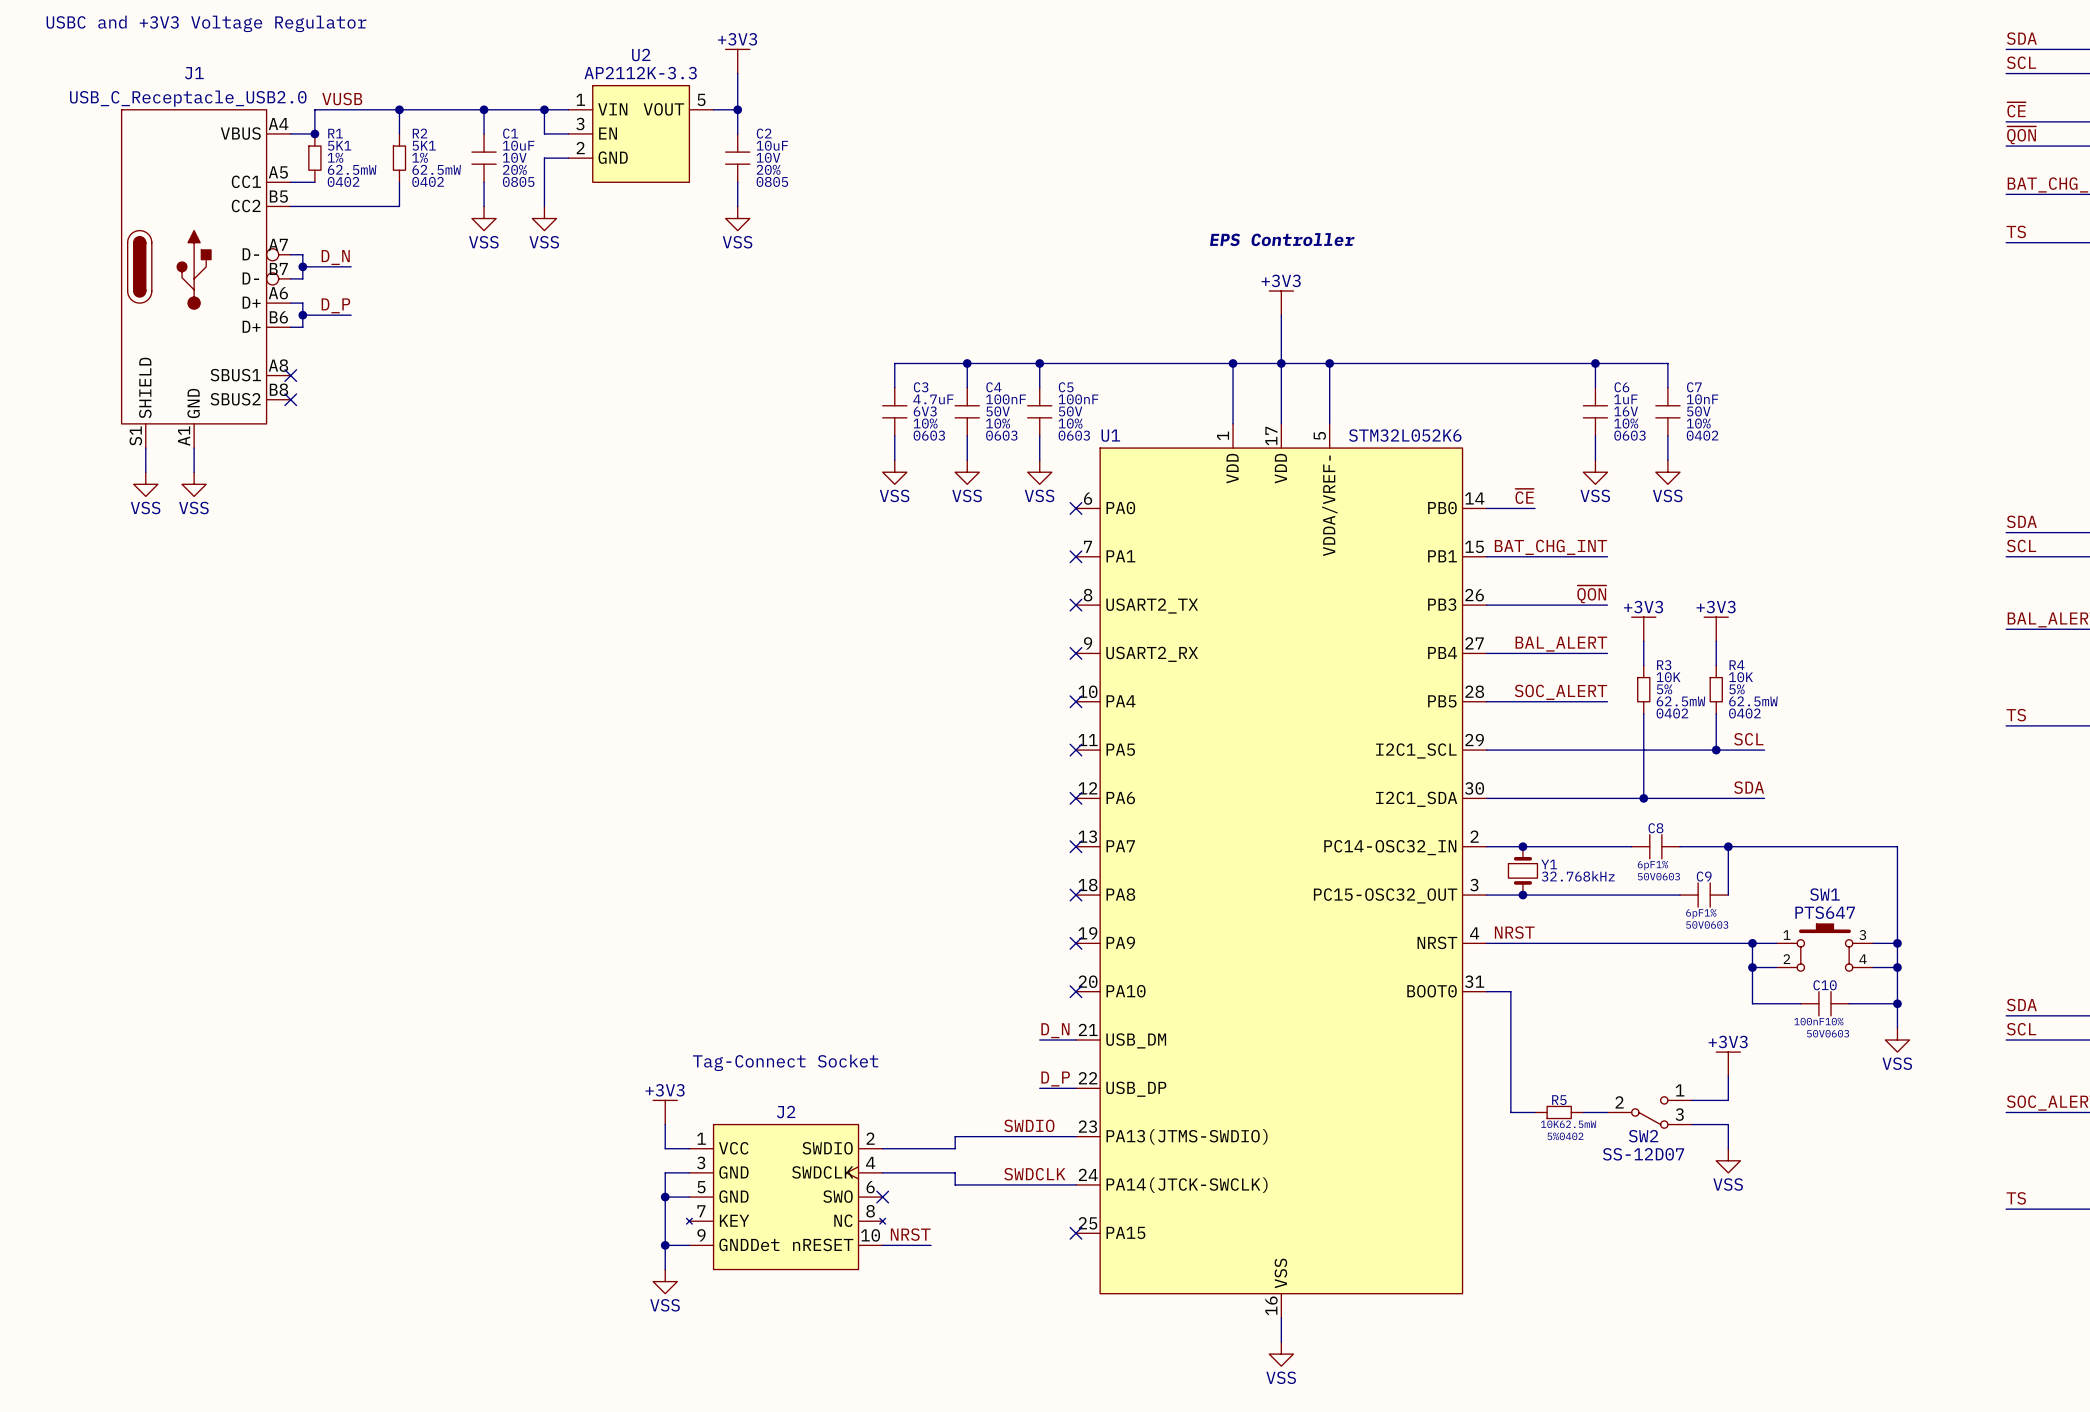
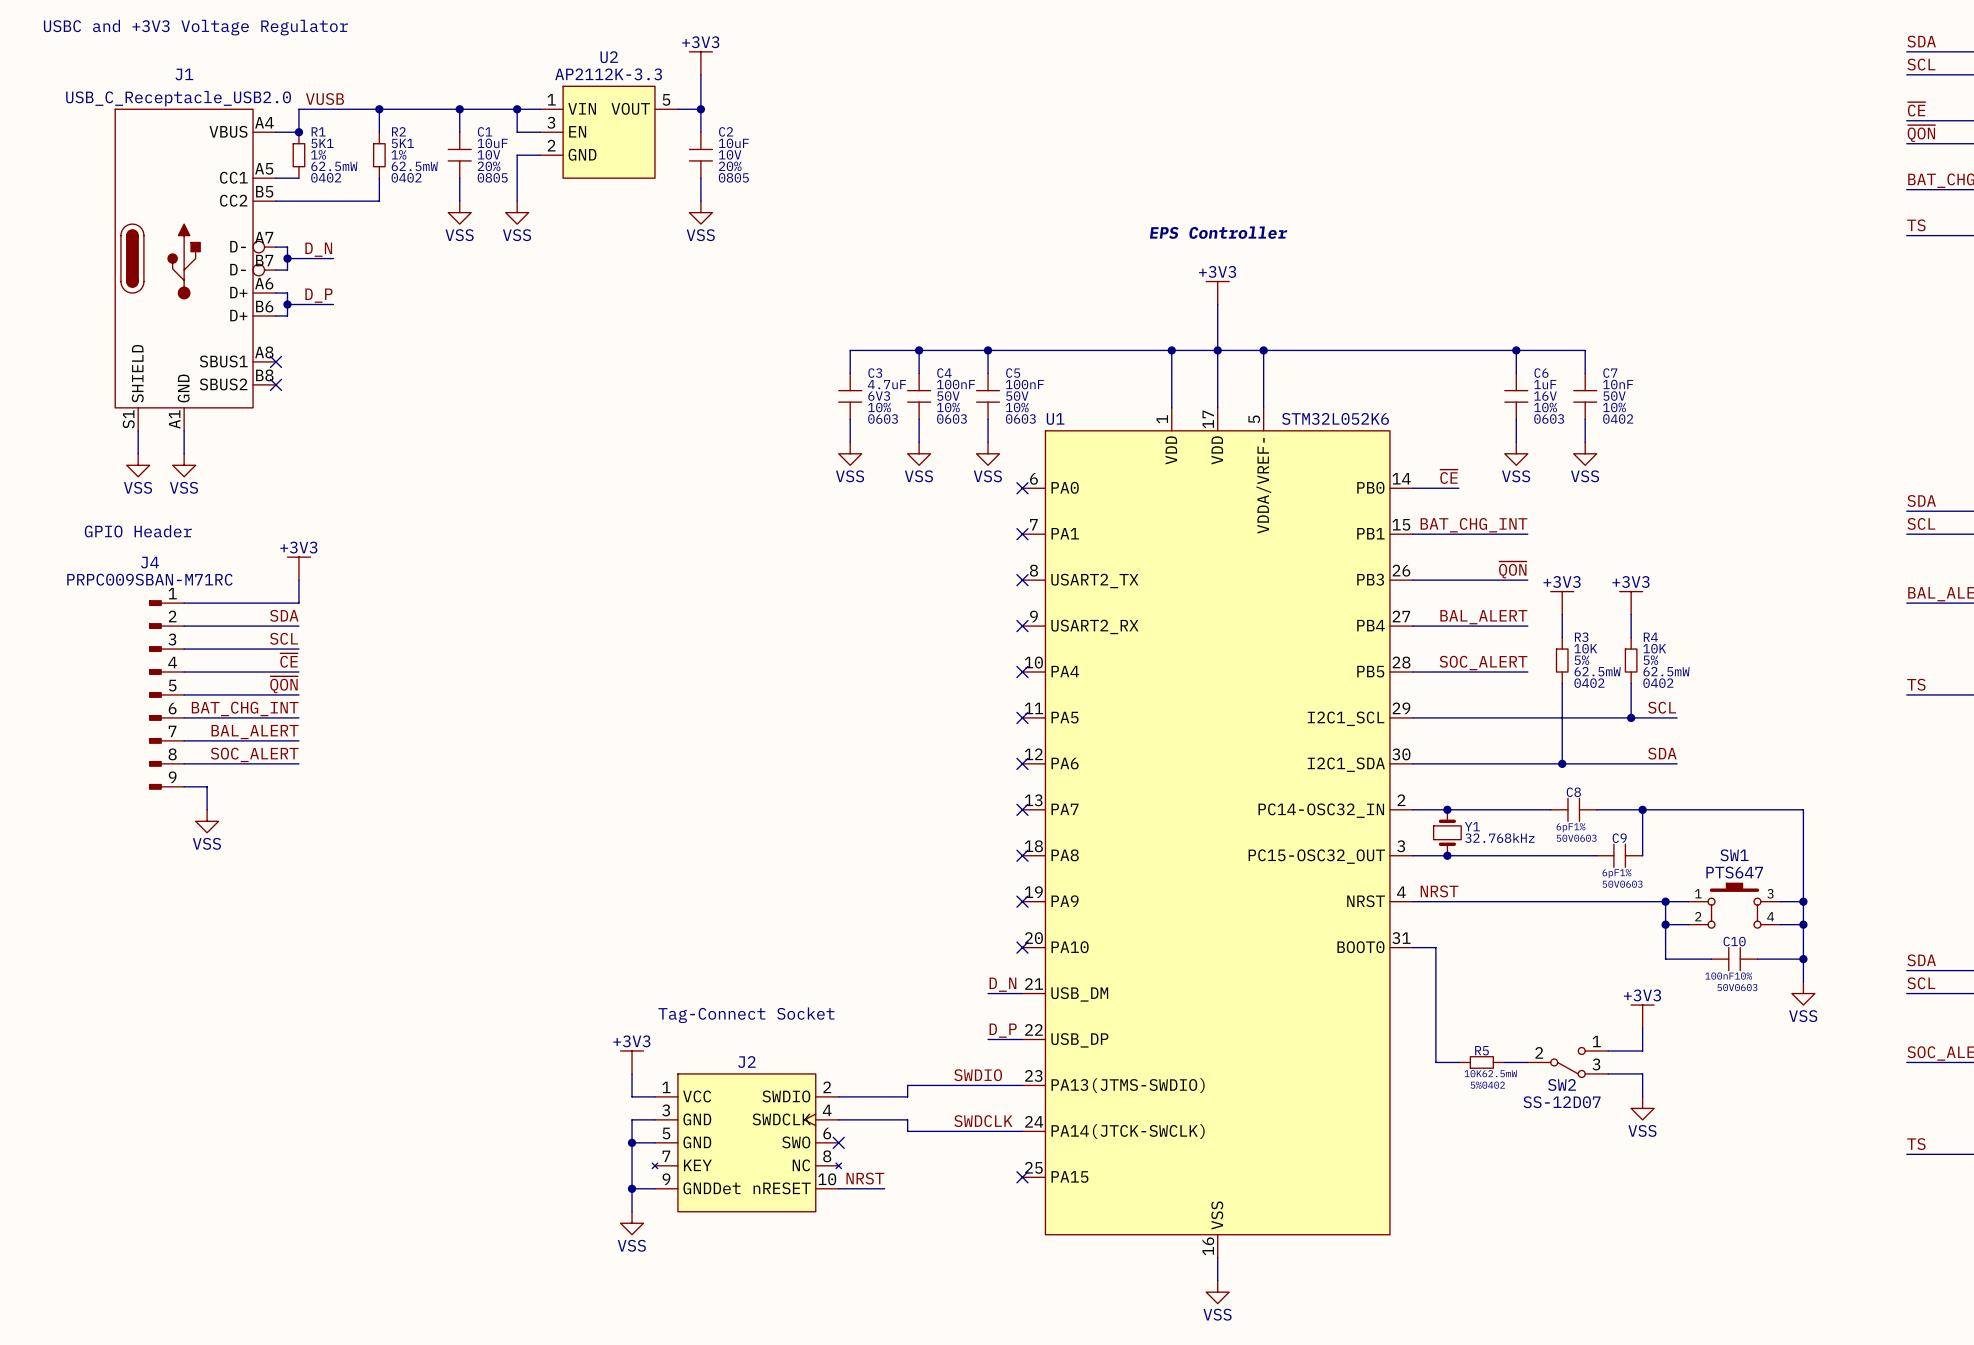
text: none -> GPIO Header (138, 531)
power symbol: none -> +3V3 (298, 568)
wire: none -> (298, 580) (298, 603) (184, 603)
label: none -> SDA (284, 615)
wire: none -> (184, 626) (298, 626)
label: none -> SCL (283, 638)
wire: none -> (184, 649) (298, 649)
label: none -> ~{CE} (289, 660)
wire: none -> (184, 672) (298, 672)
label: none -> ~{QON} (284, 684)
J4: none -> PRPC009SBAN-M71RC (166, 694)
wire: none -> (184, 694) (298, 694)
label: none -> BAT_CHG_INT (245, 708)
wire: none -> (184, 717) (298, 717)
label: none -> BAL_ALERT (255, 732)
wire: none -> (184, 740) (298, 740)
label: none -> SOC_ALERT (254, 754)
wire: none -> (184, 763) (298, 763)
wire: none -> (184, 786) (207, 786) (207, 809)
power symbol: none -> VSS (207, 821)

